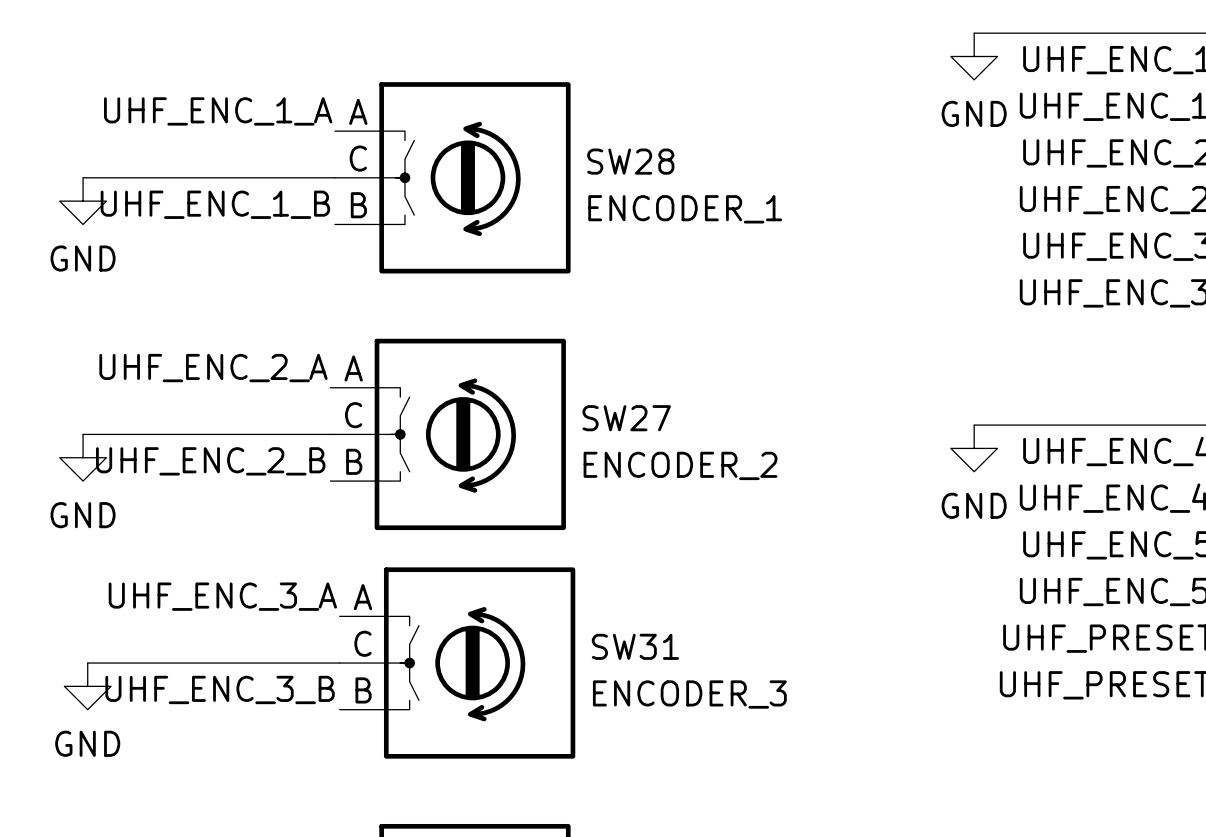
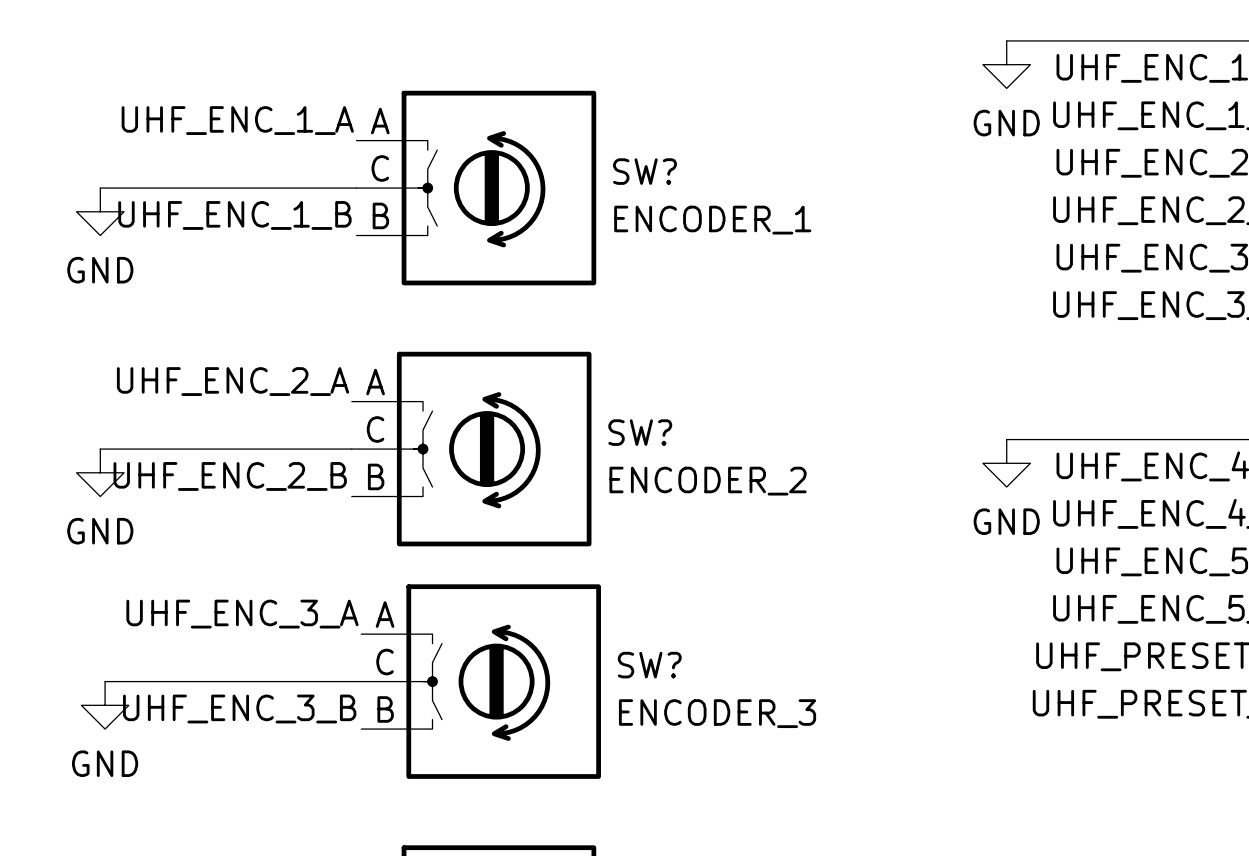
SW28 name: SW28 (630, 161) -> SW? (644, 171)
SW27 name: SW27 (626, 418) -> SW? (640, 432)
SW31 name: SW31 (635, 646) -> SW? (649, 665)

